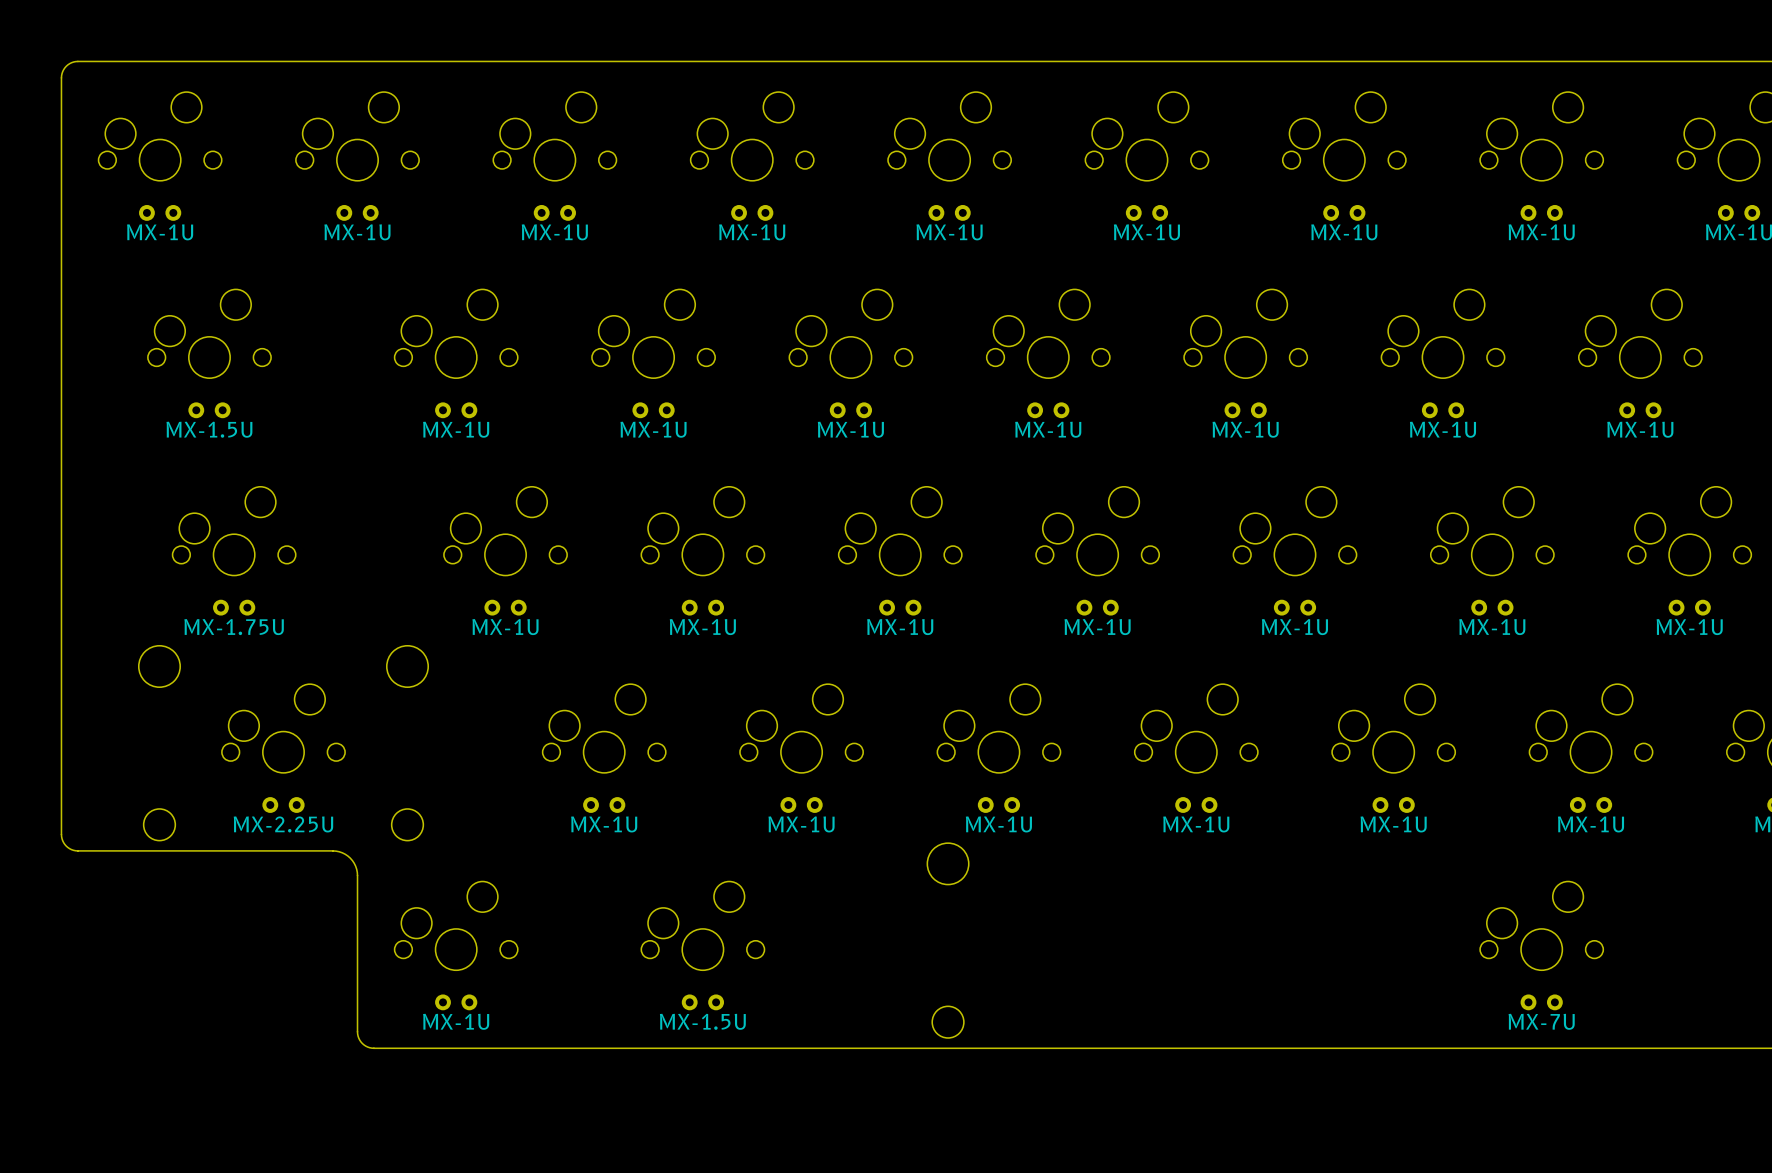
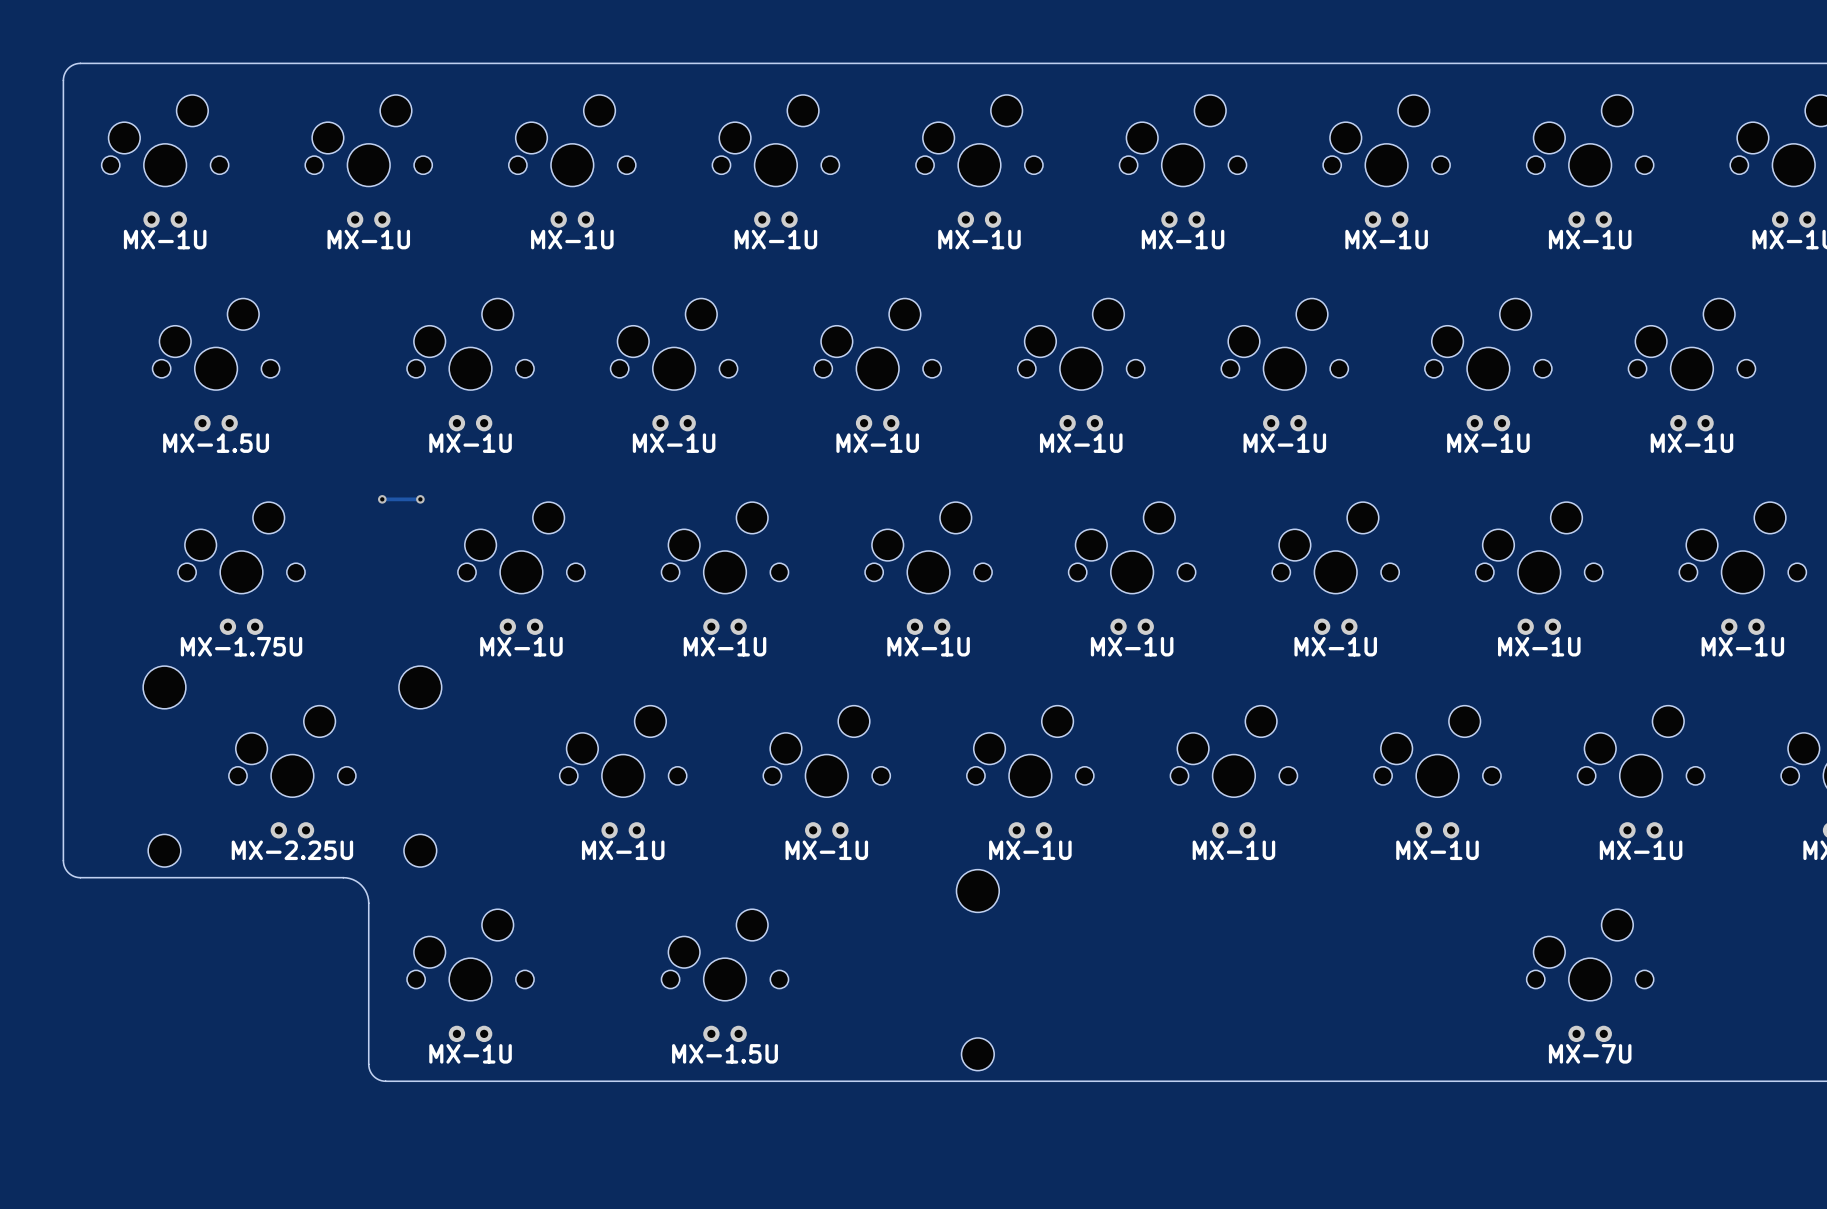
track: none -> (382, 499) (420, 499)
via: none -> (382, 499)
via: none -> (420, 499)

